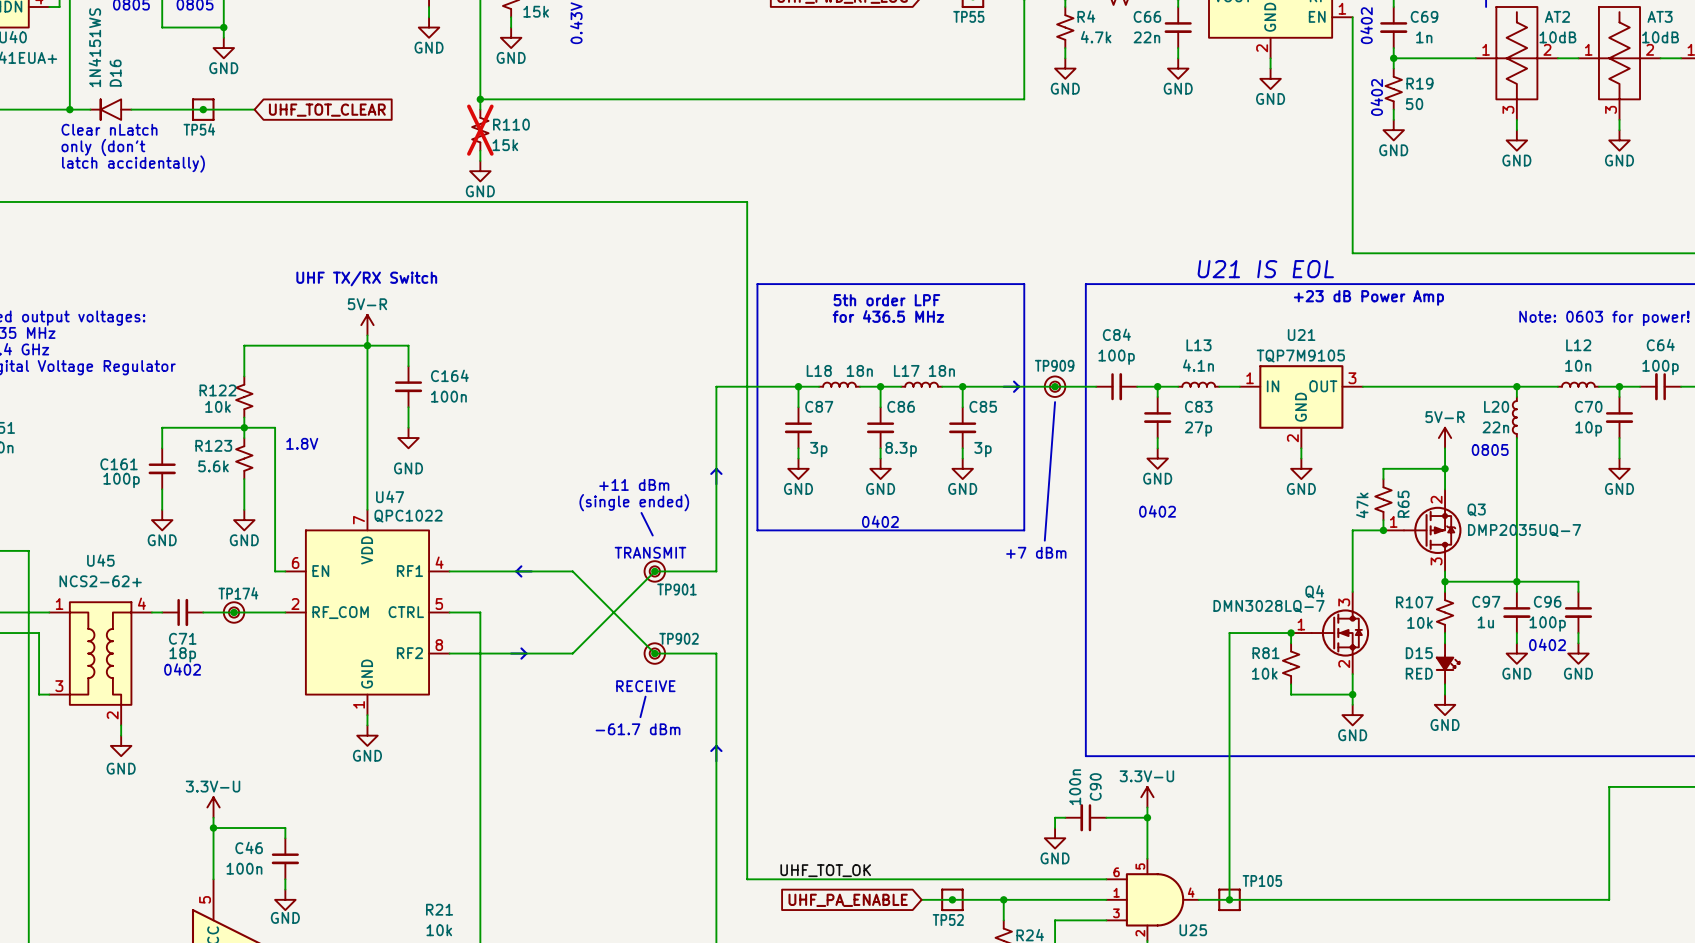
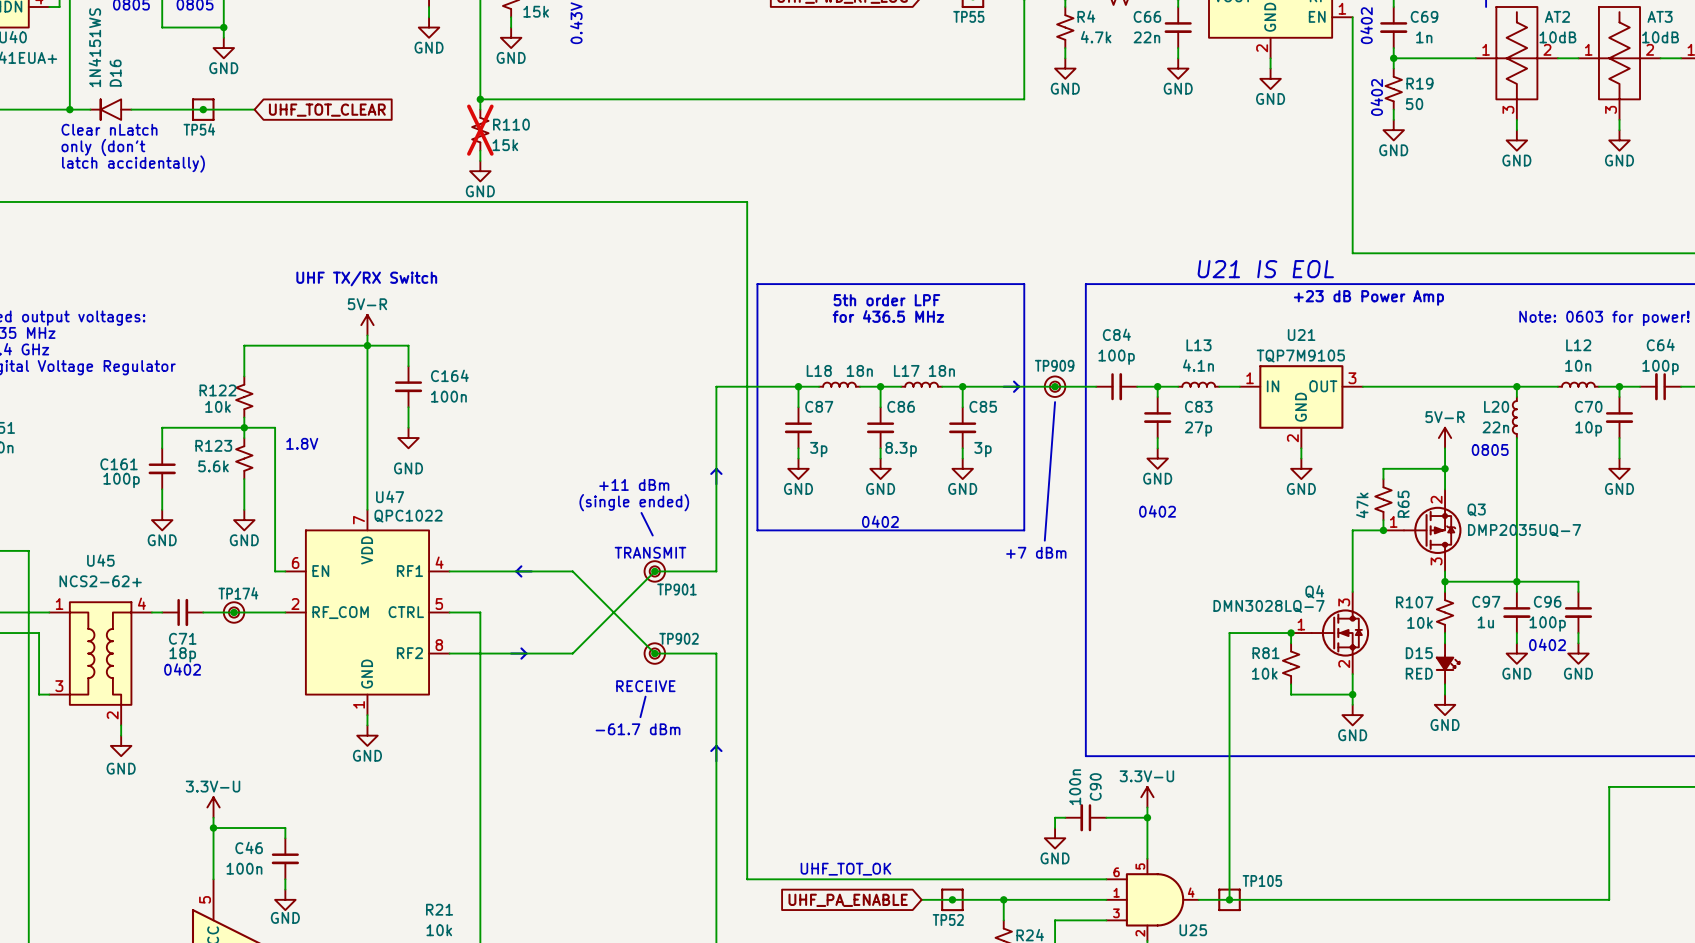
text: none -> UHF_TOT_OK (845, 869)
label: UHF_TOT_OK (825, 870) -> none

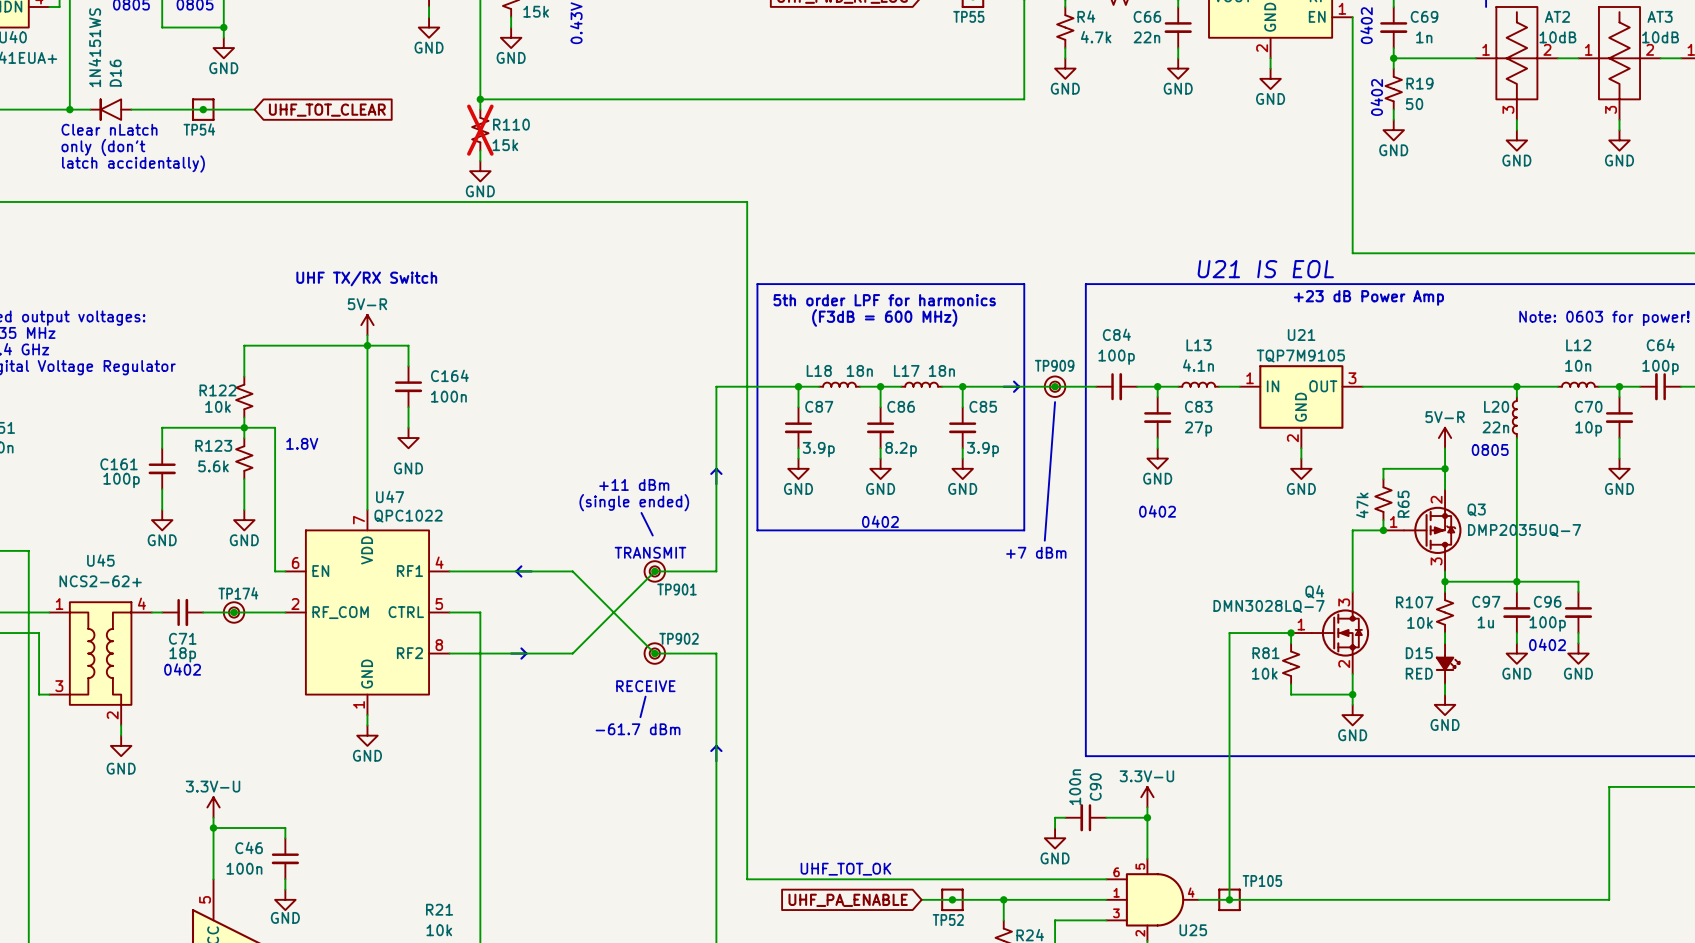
text: 5th order LPF (886, 300) -> 5th order LPF for harmonics (884, 300)
text: for 436.5 MHz (888, 316) -> none
text: none -> (F3dB = 600 MHz) (884, 317)
C87 value: 3p (818, 449) -> 3.9p (818, 449)
C86 value: 8.3p (901, 449) -> 8.2p (901, 449)
C85 value: 3p (982, 449) -> 3.9p (982, 449)

